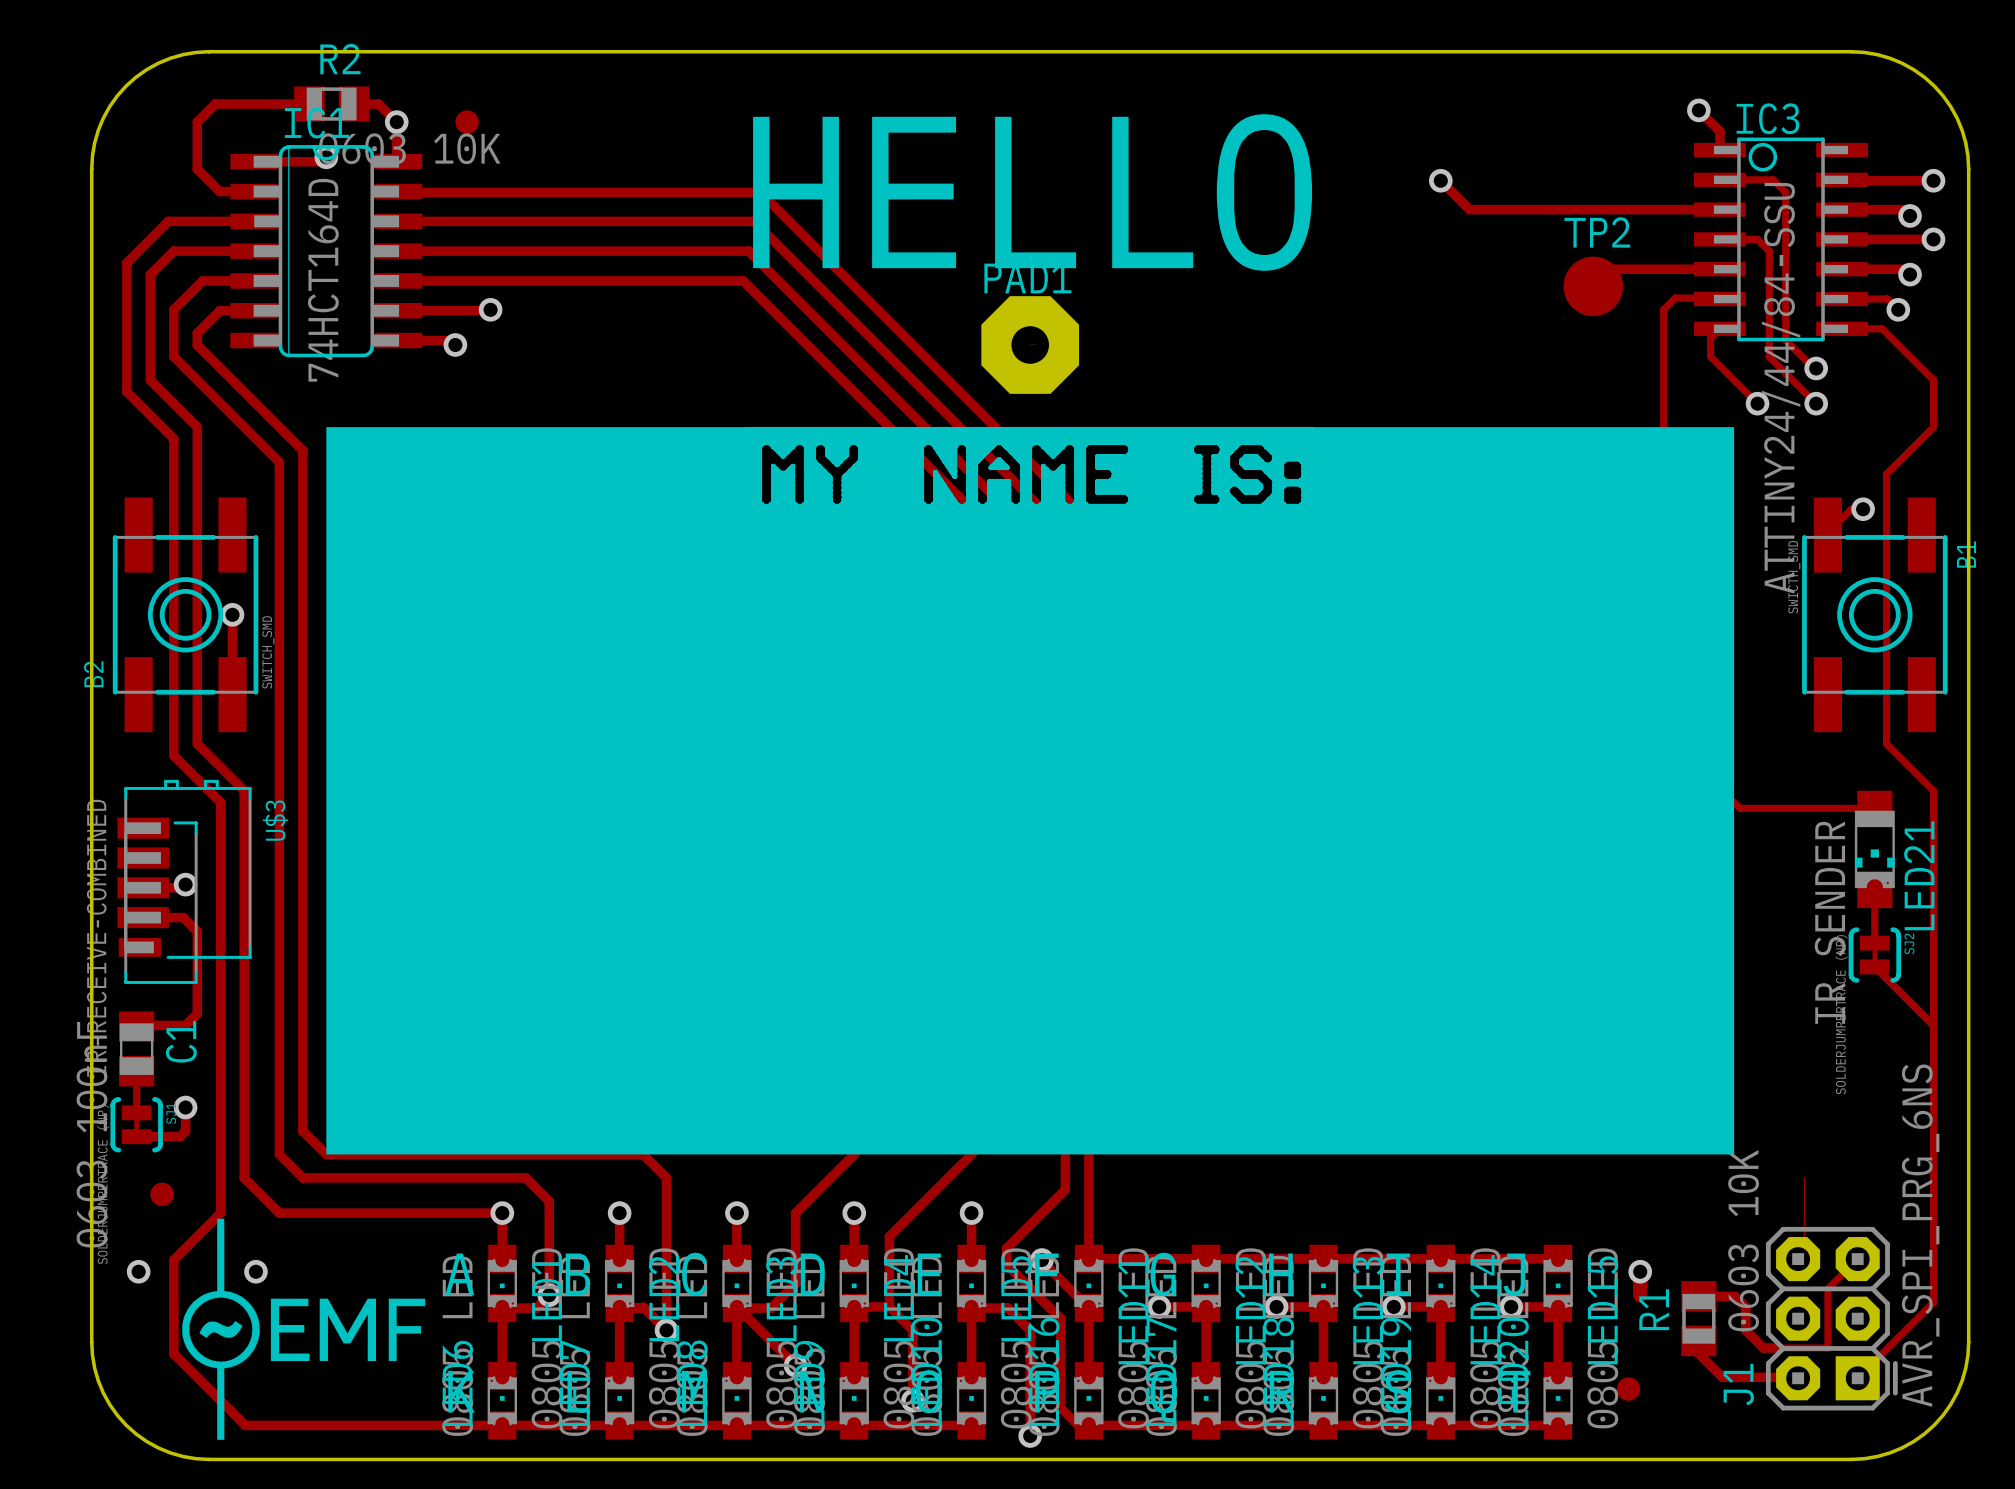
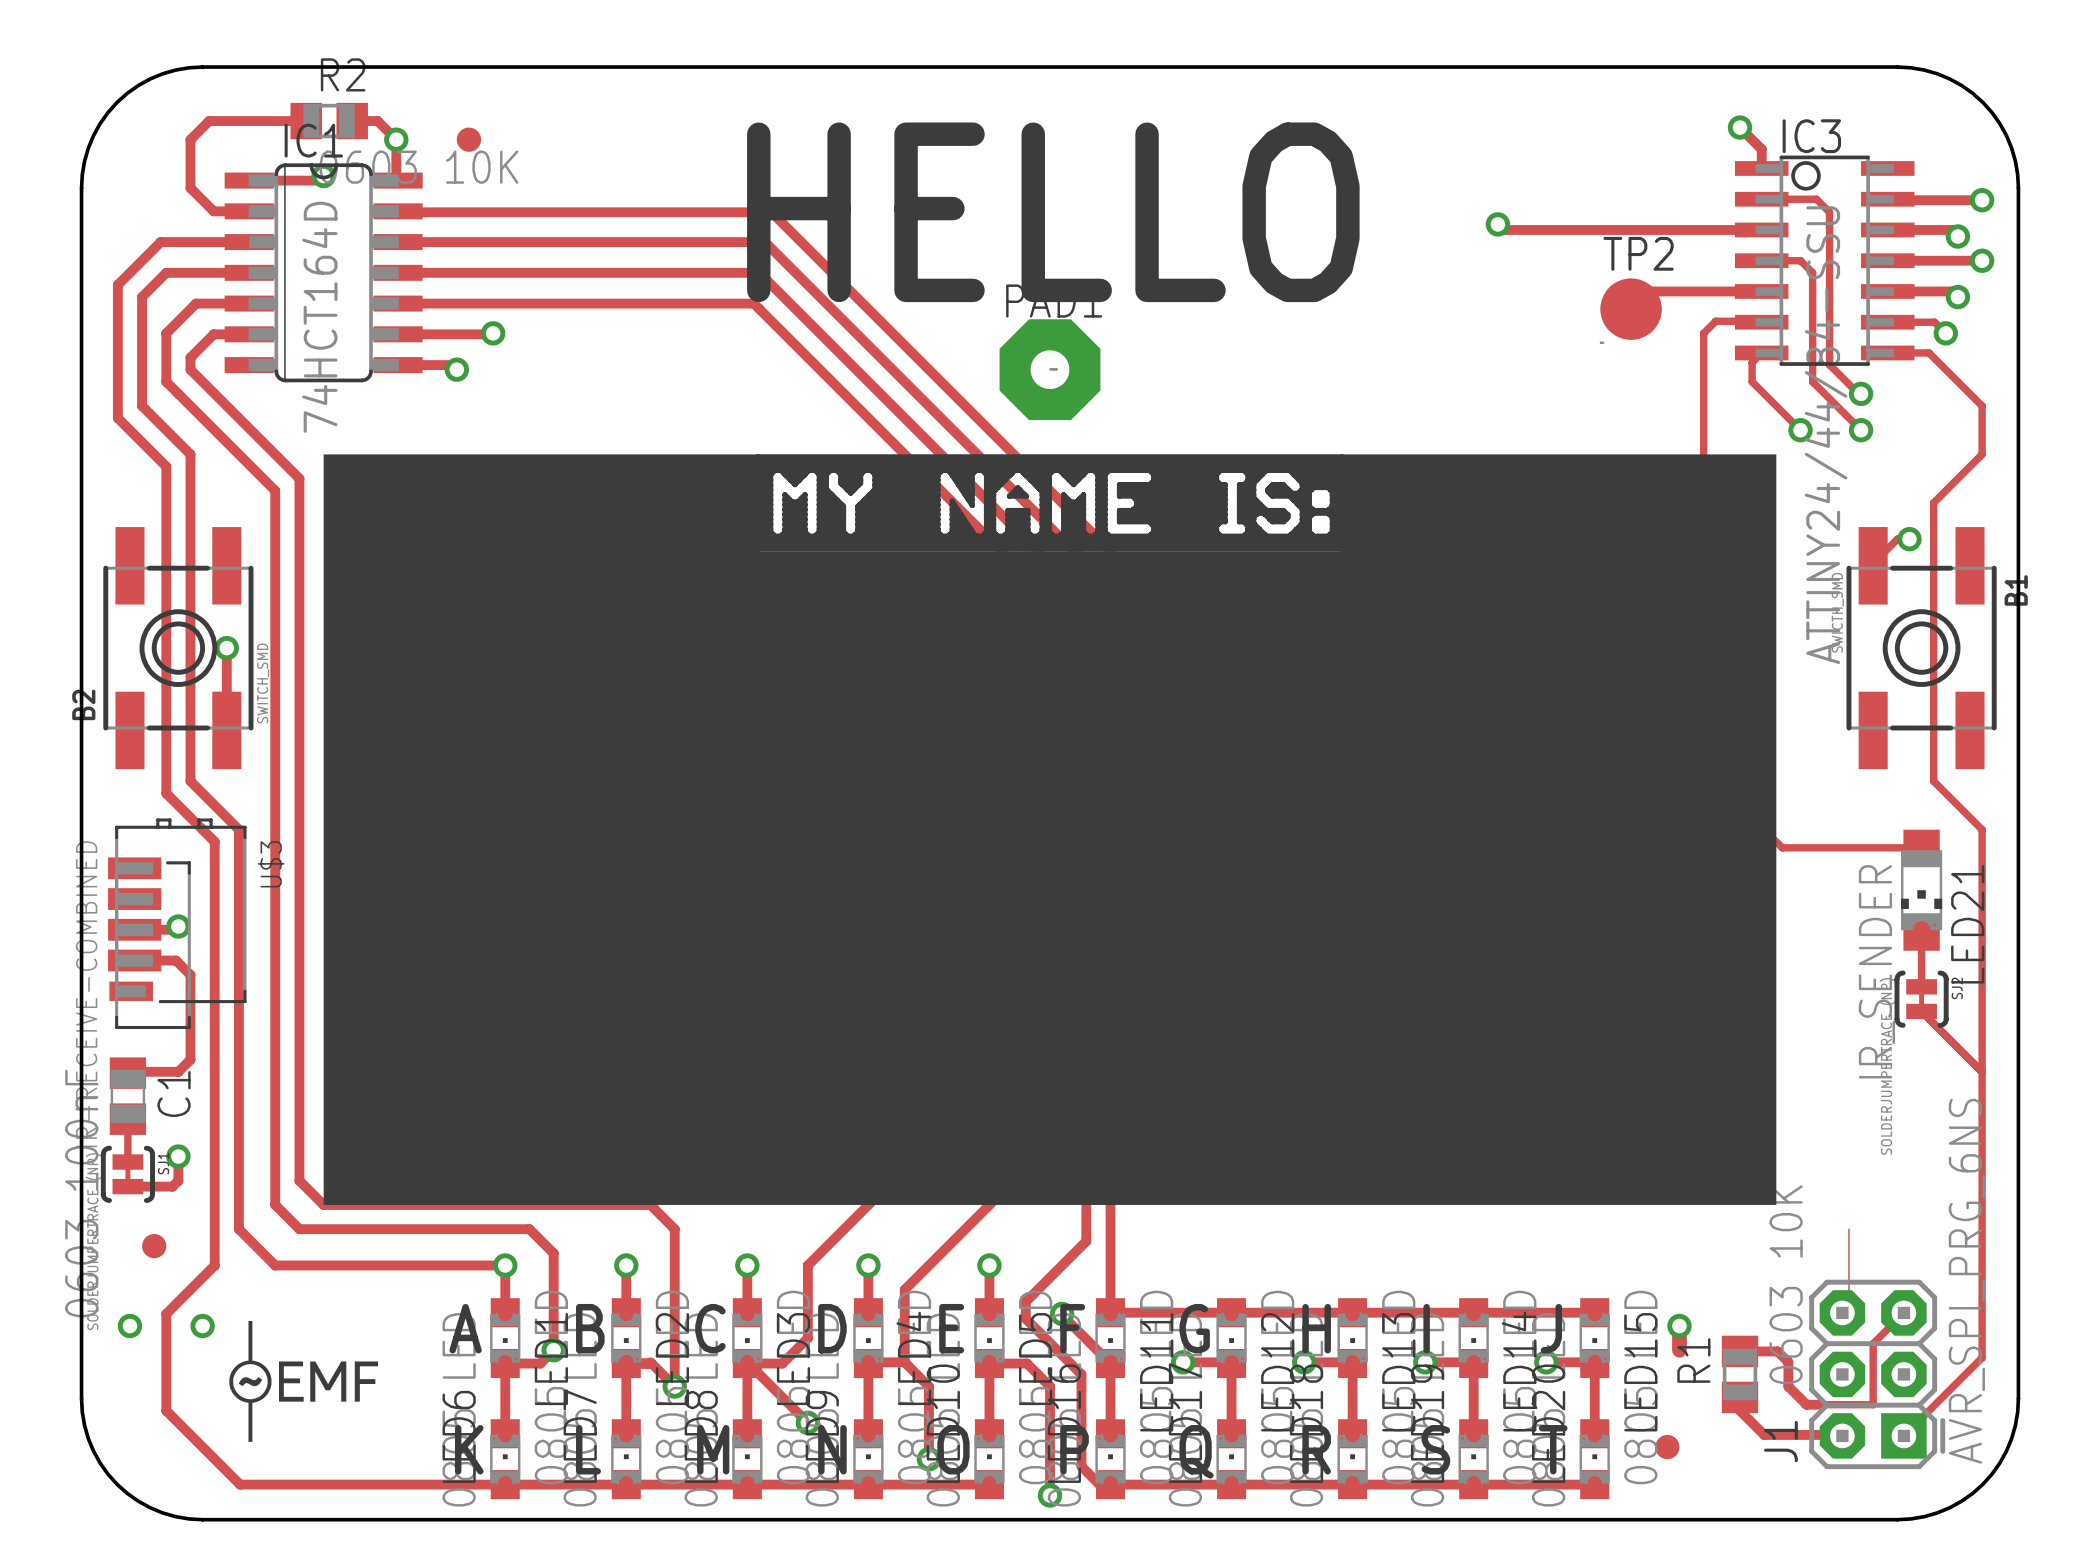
track: (1440, 180) (1464, 204) -> none
via position: (1440, 180) -> (1497, 224)
drawing shape: [182, 1218, 426, 1440] -> [229, 1321, 379, 1442]
via position: (255, 1271) -> (202, 1326)

